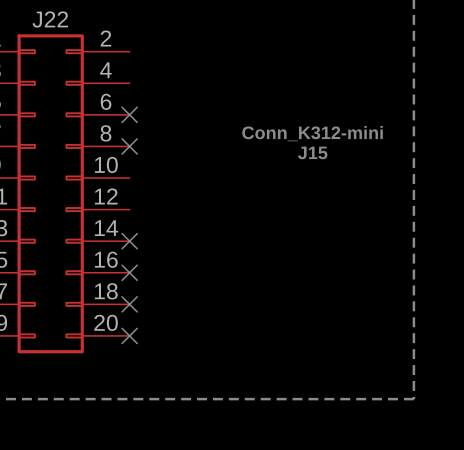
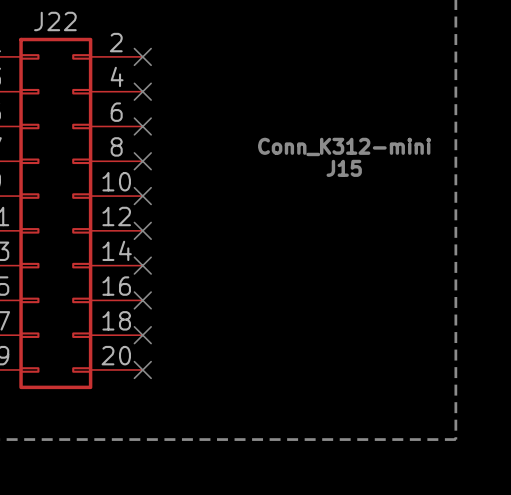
no-connect mark: none -> (142, 56)
no-connect mark: none -> (142, 91)
no-connect mark: none -> (142, 196)
no-connect mark: none -> (142, 230)

